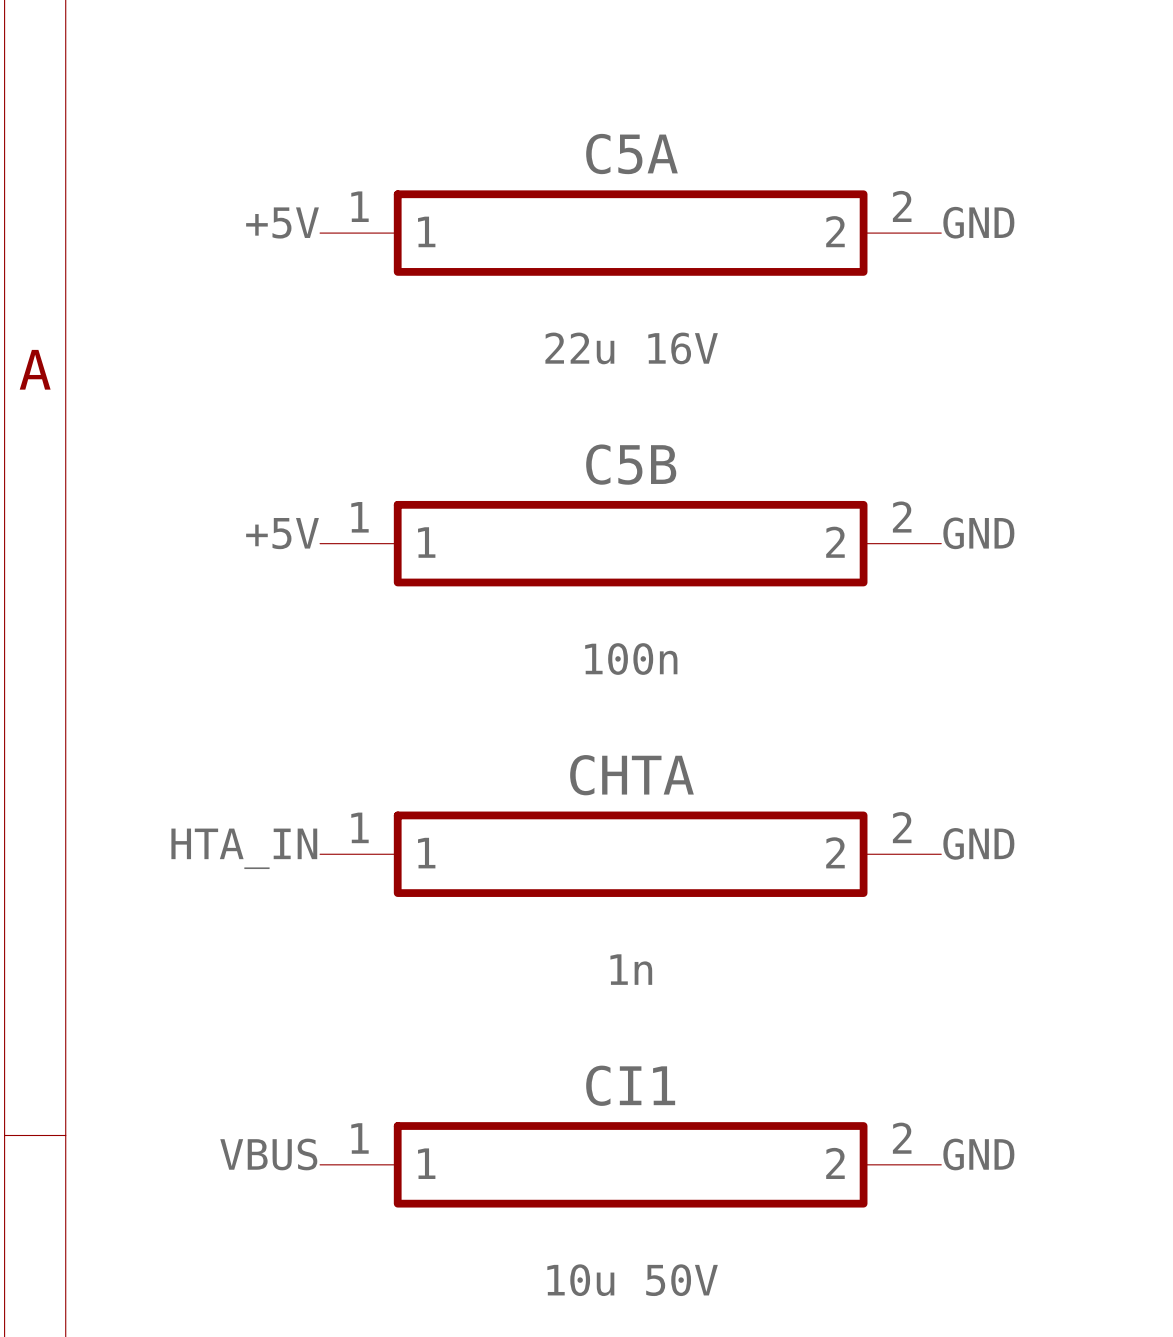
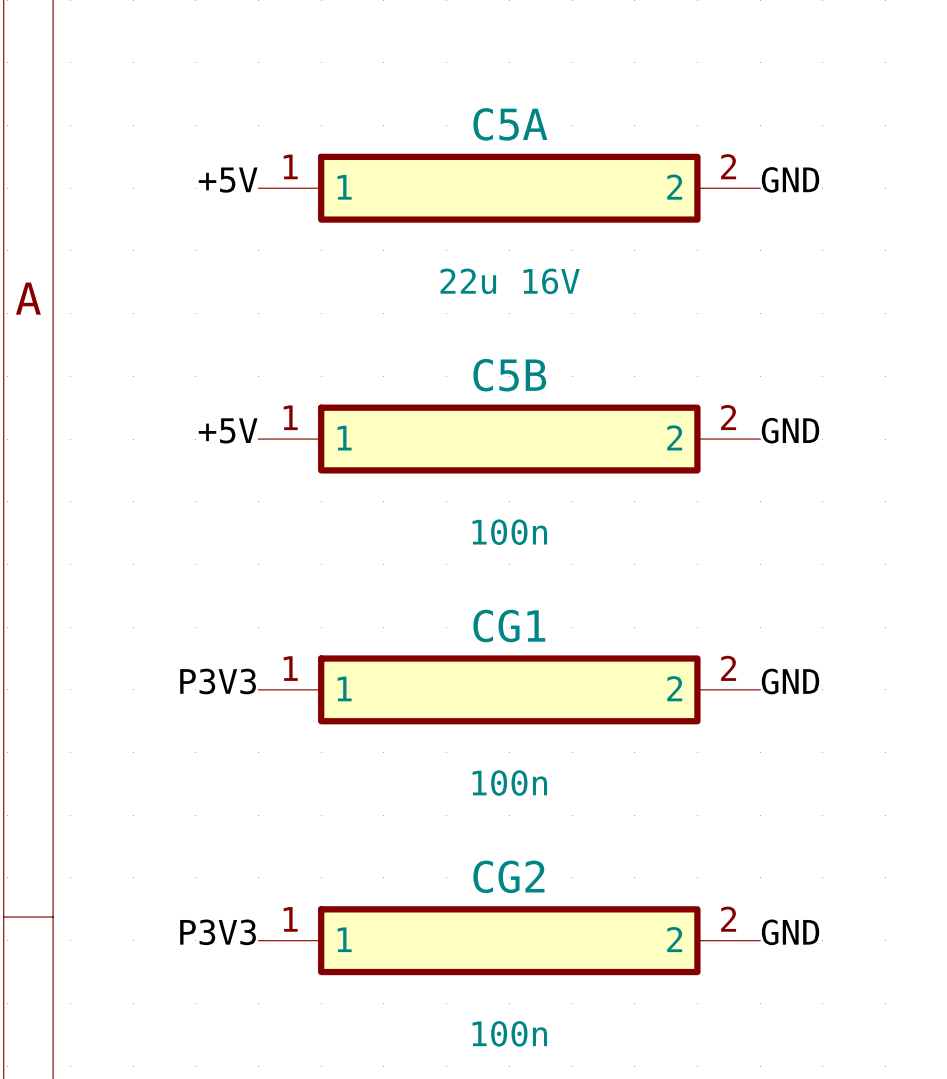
CHTA name: CHTA (631, 775) -> CG1 (509, 626)
label: HTA_IN (244, 848) -> P3V3 (218, 681)
CHTA value: 1n (631, 969) -> 100n (509, 783)
CI1 name: CI1 (630, 1085) -> CG2 (508, 876)
label: VBUS (268, 1154) -> P3V3 (218, 932)
CI1 value: 10u 50V (632, 1280) -> 100n (509, 1033)

